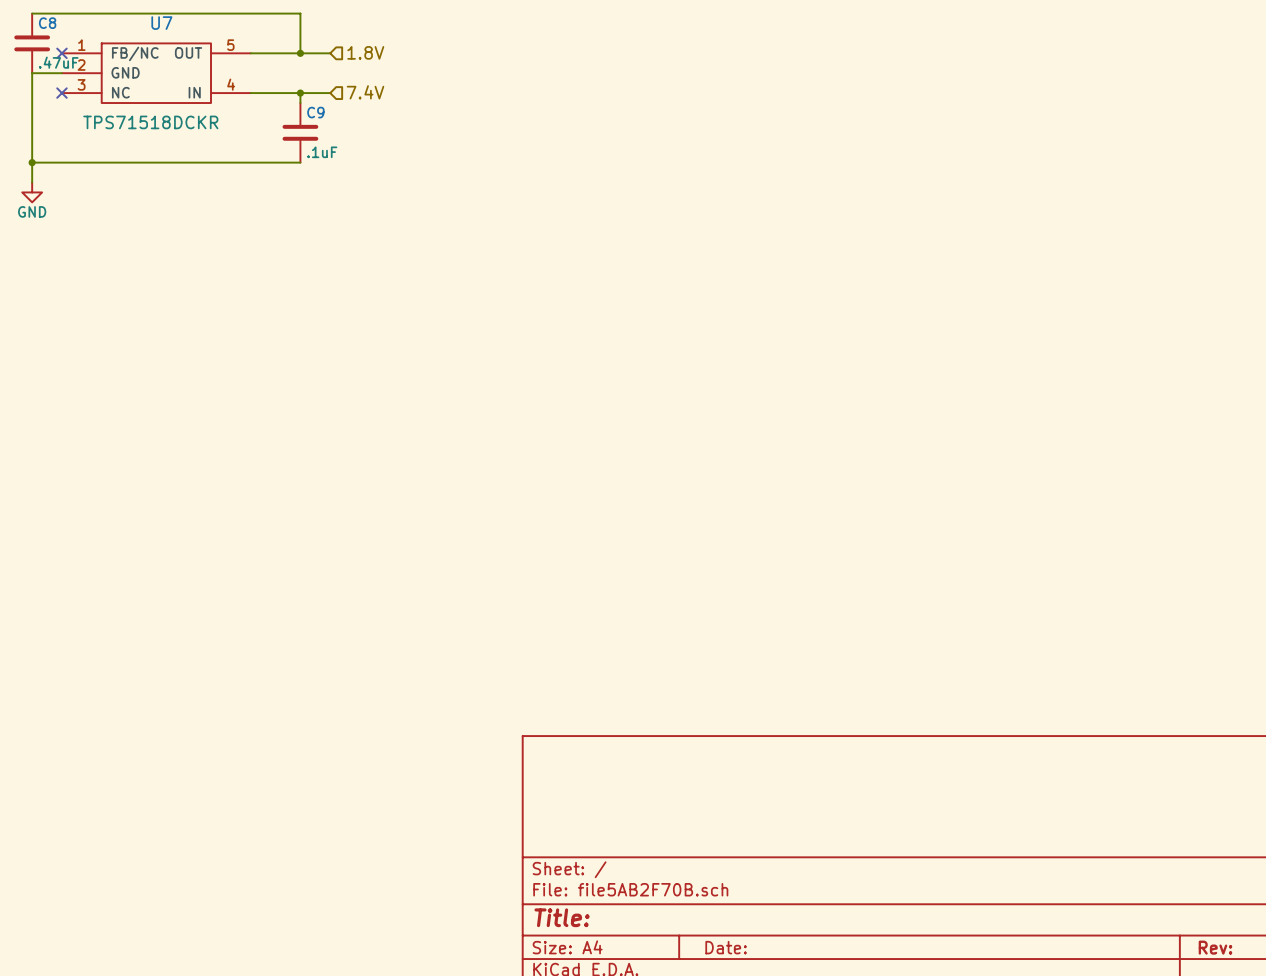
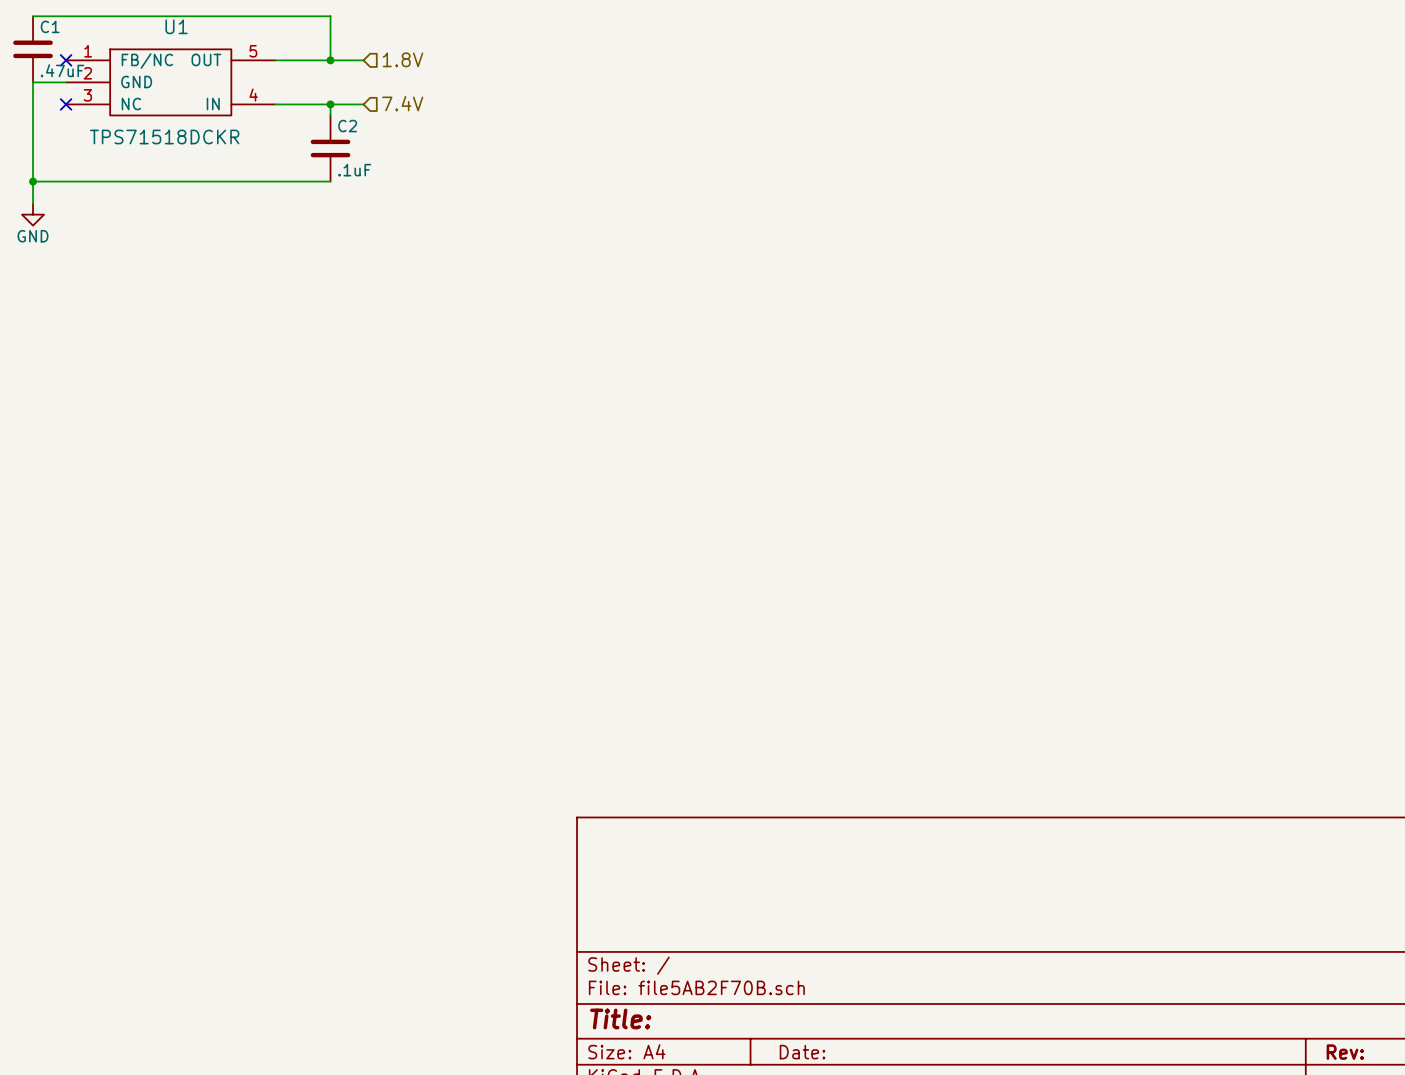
C8 name: C8 (47, 23) -> C1 (50, 26)
U7 name: U7 (161, 23) -> U1 (176, 26)
C9 name: C9 (315, 112) -> C2 (347, 126)

